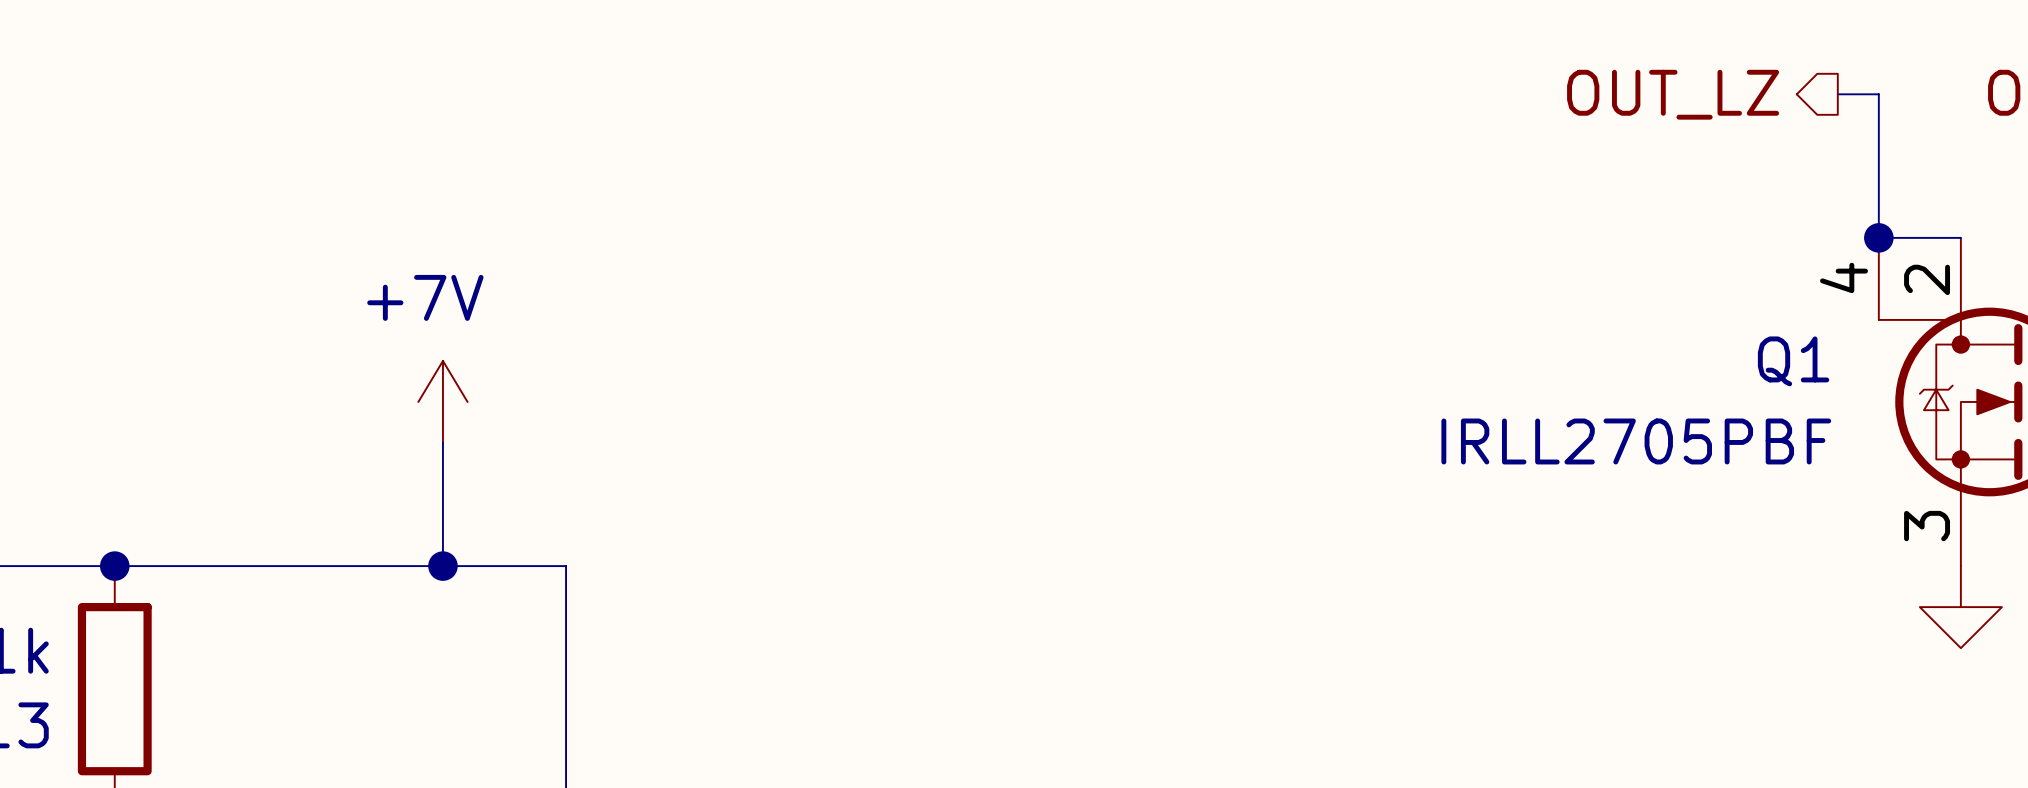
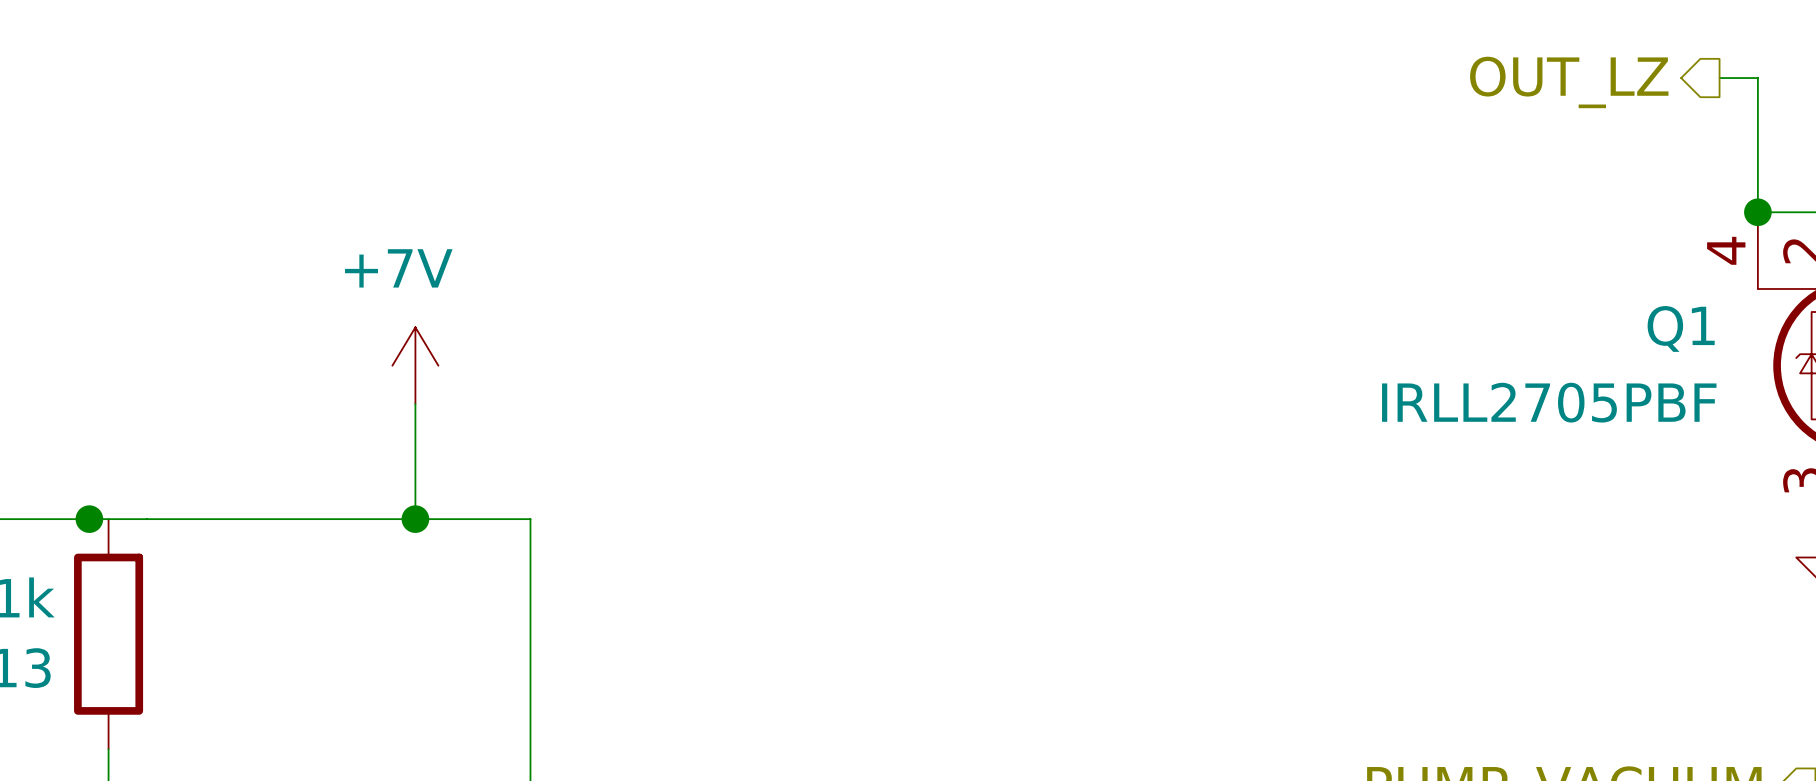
junction position: (114, 566) -> (89, 519)

